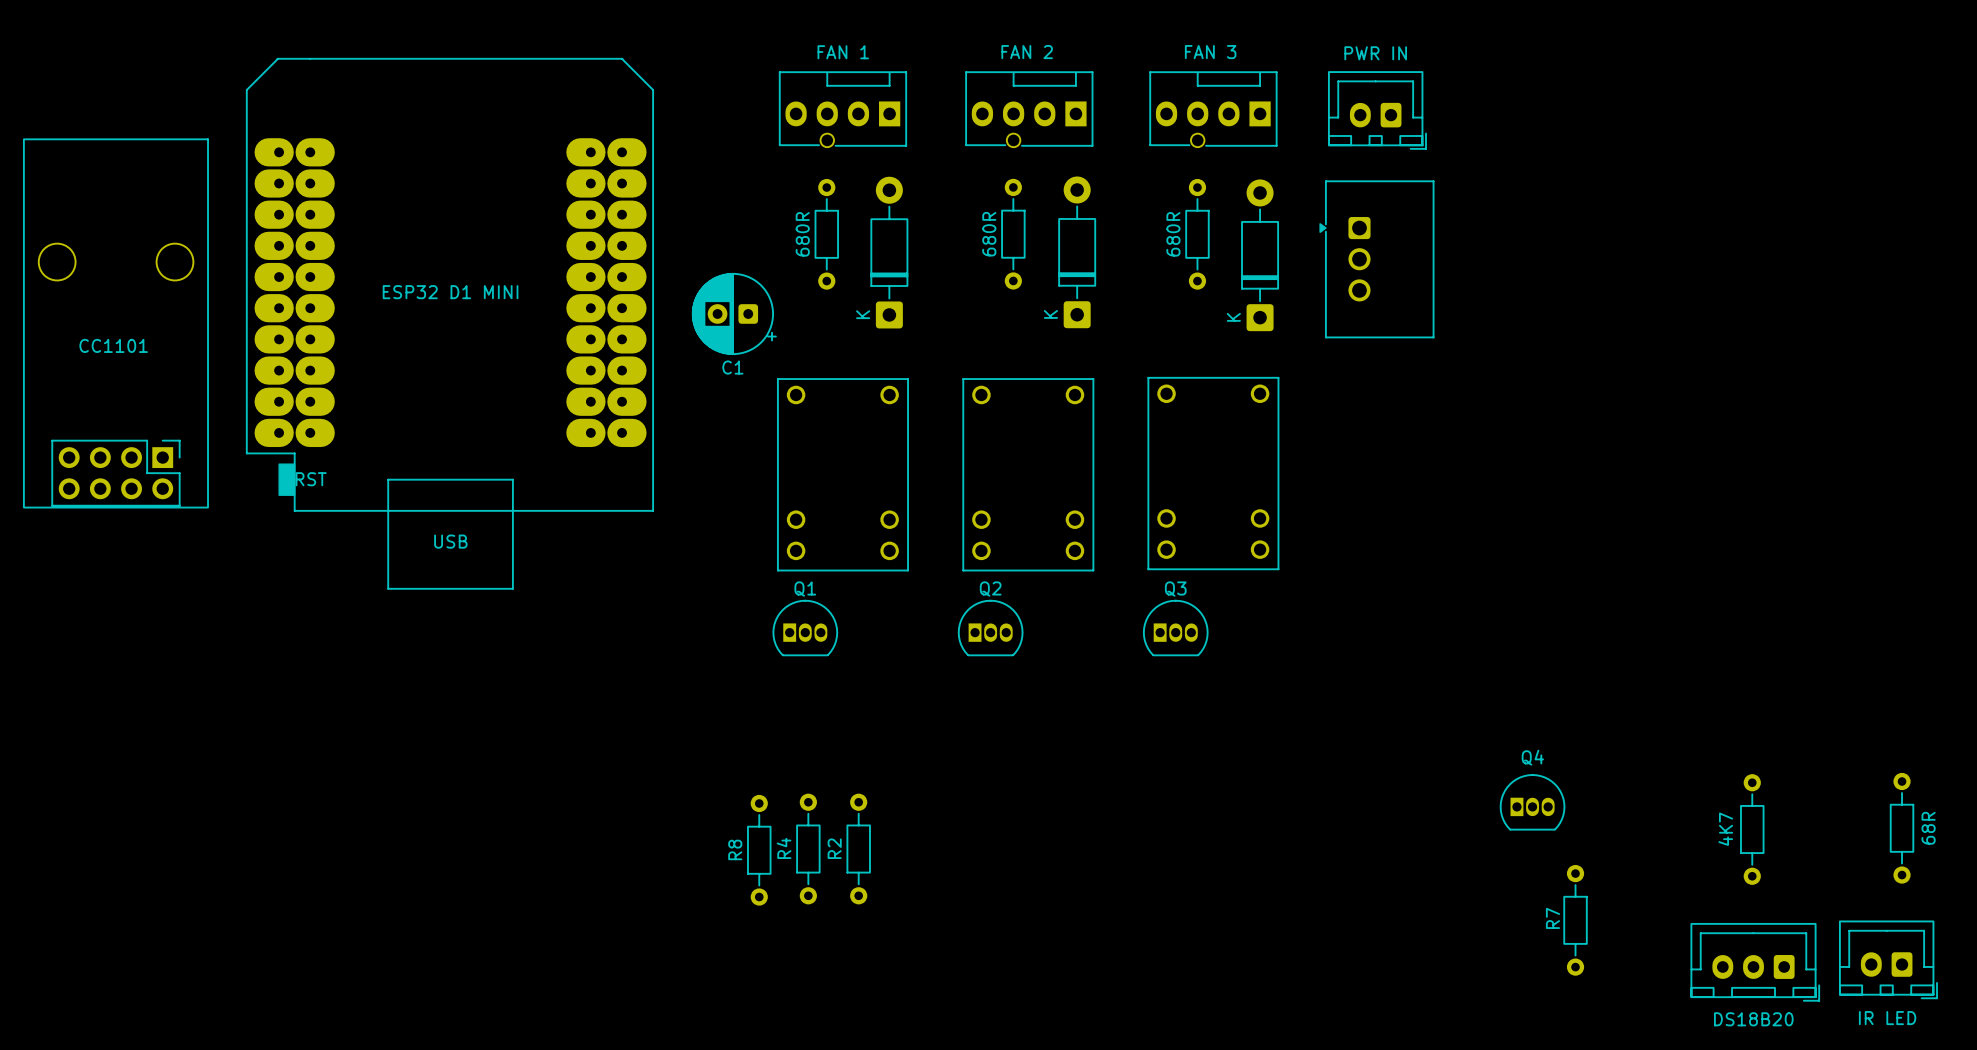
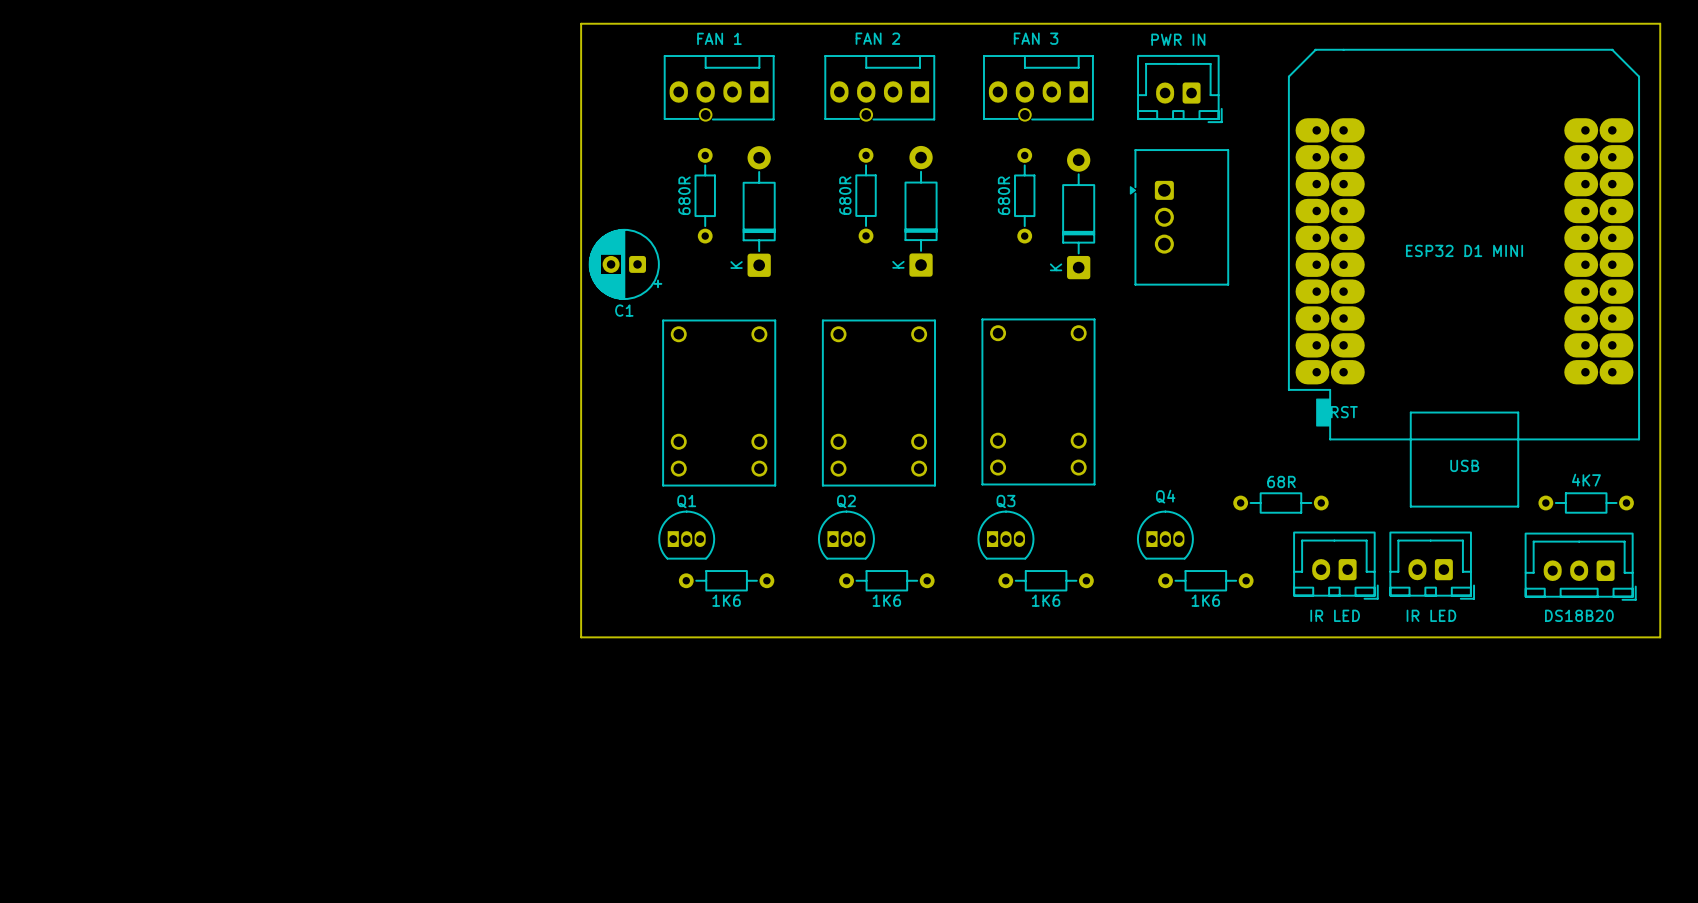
board edge: none -> (581, 23) (1660, 23) (1660, 637) (581, 637) (581, 23)
part: CC1101 (115, 323) -> none
part: ESP32 D1 MINI (449, 323) -> none
part: none -> ESP32 D1 MINI (1463, 278)
part: none -> 68R (1280, 502)
part: none -> IR LED (1335, 565)
part: none -> IR LED (1432, 565)
part: none -> DS18B20 (1580, 566)
part: none -> 1K6 (726, 580)
part: none -> 1K6 (886, 580)
part: none -> 1K6 (1046, 580)
part: none -> 1K6 (1205, 580)
Q4 position: (1532, 802) -> (1165, 535)
part: 68R (1902, 828) -> none
part rotation: 0° (1752, 829) -> 90° clockwise (1586, 502)
part position: (1752, 829) -> (1586, 502)
R4: (808, 849) -> none
R2: (858, 849) -> none
R8: (759, 850) -> none
R7: (1575, 920) -> none
part: IR LED (1888, 959) -> none
part: DS18B20 (1755, 962) -> none

